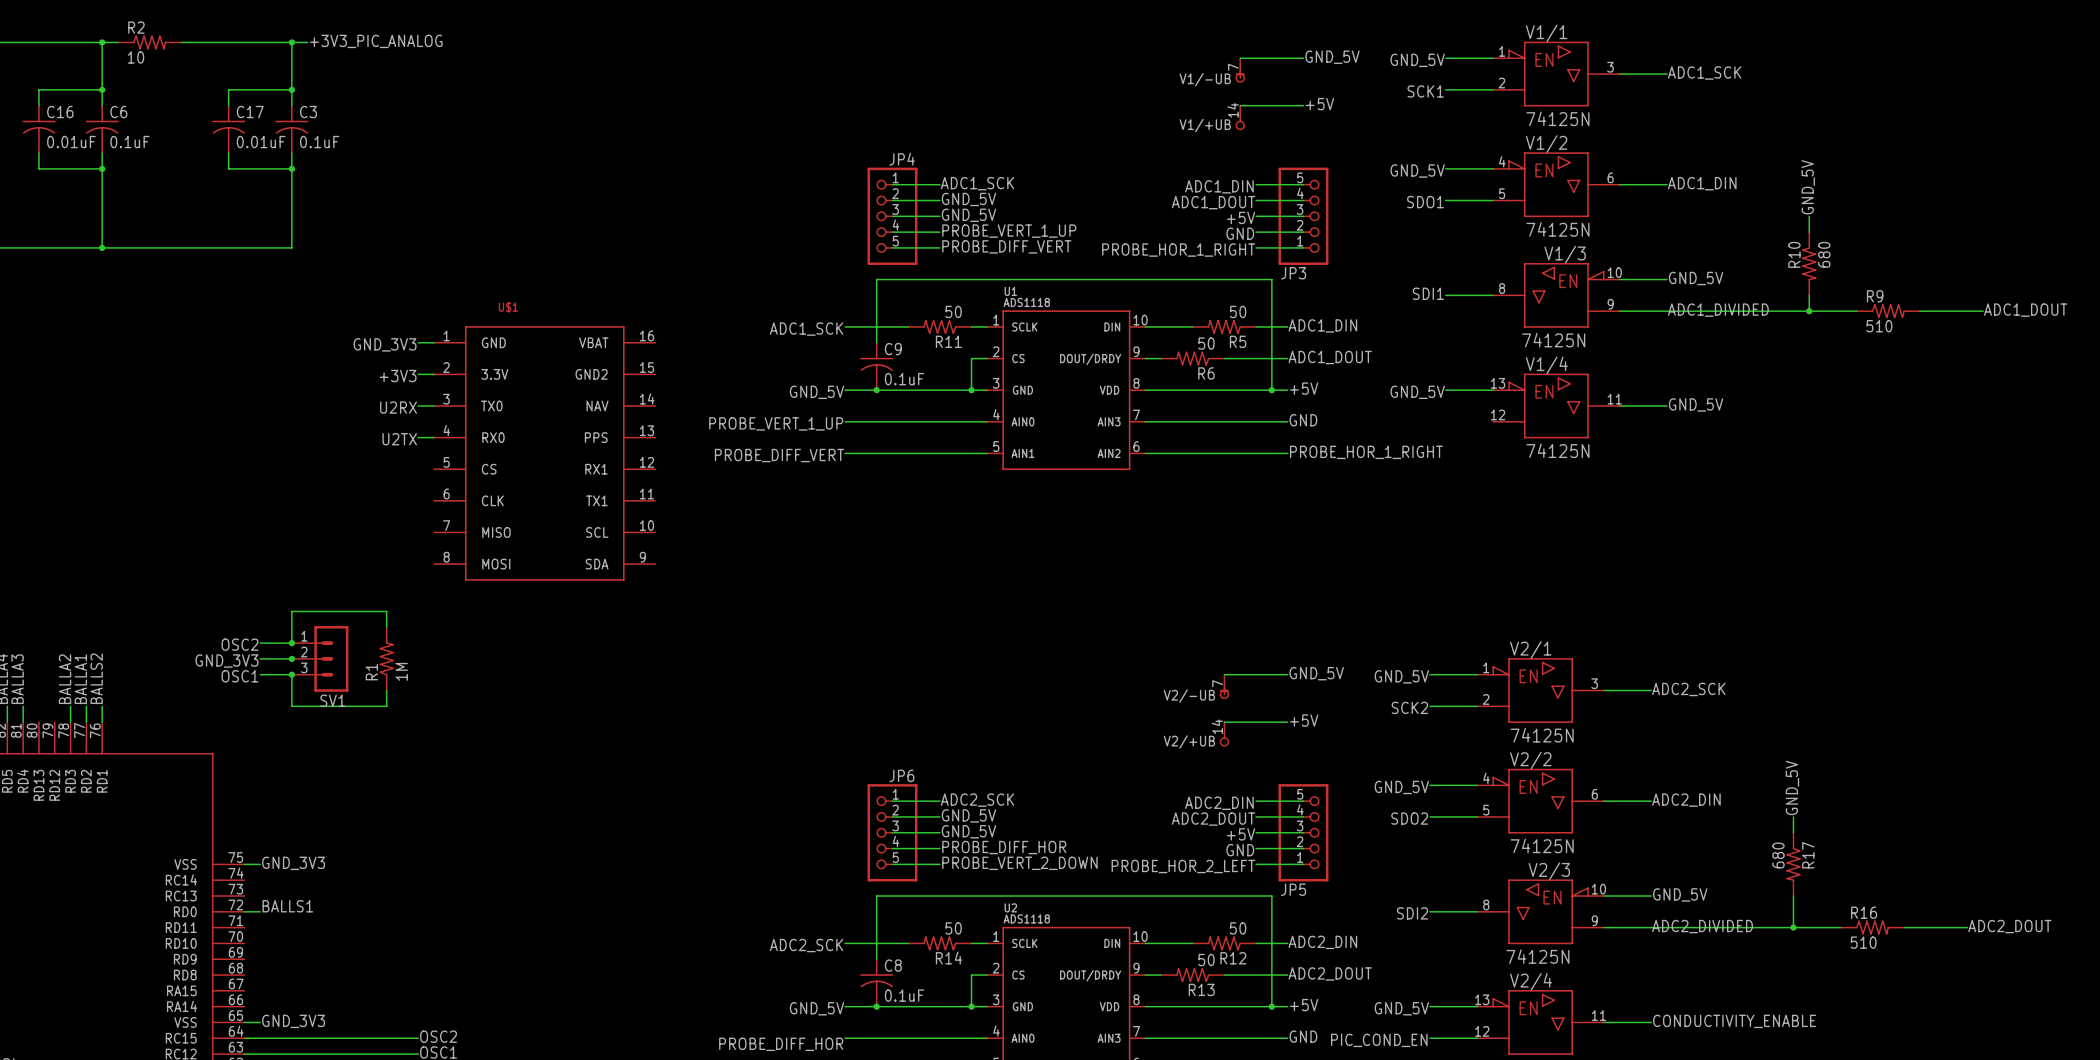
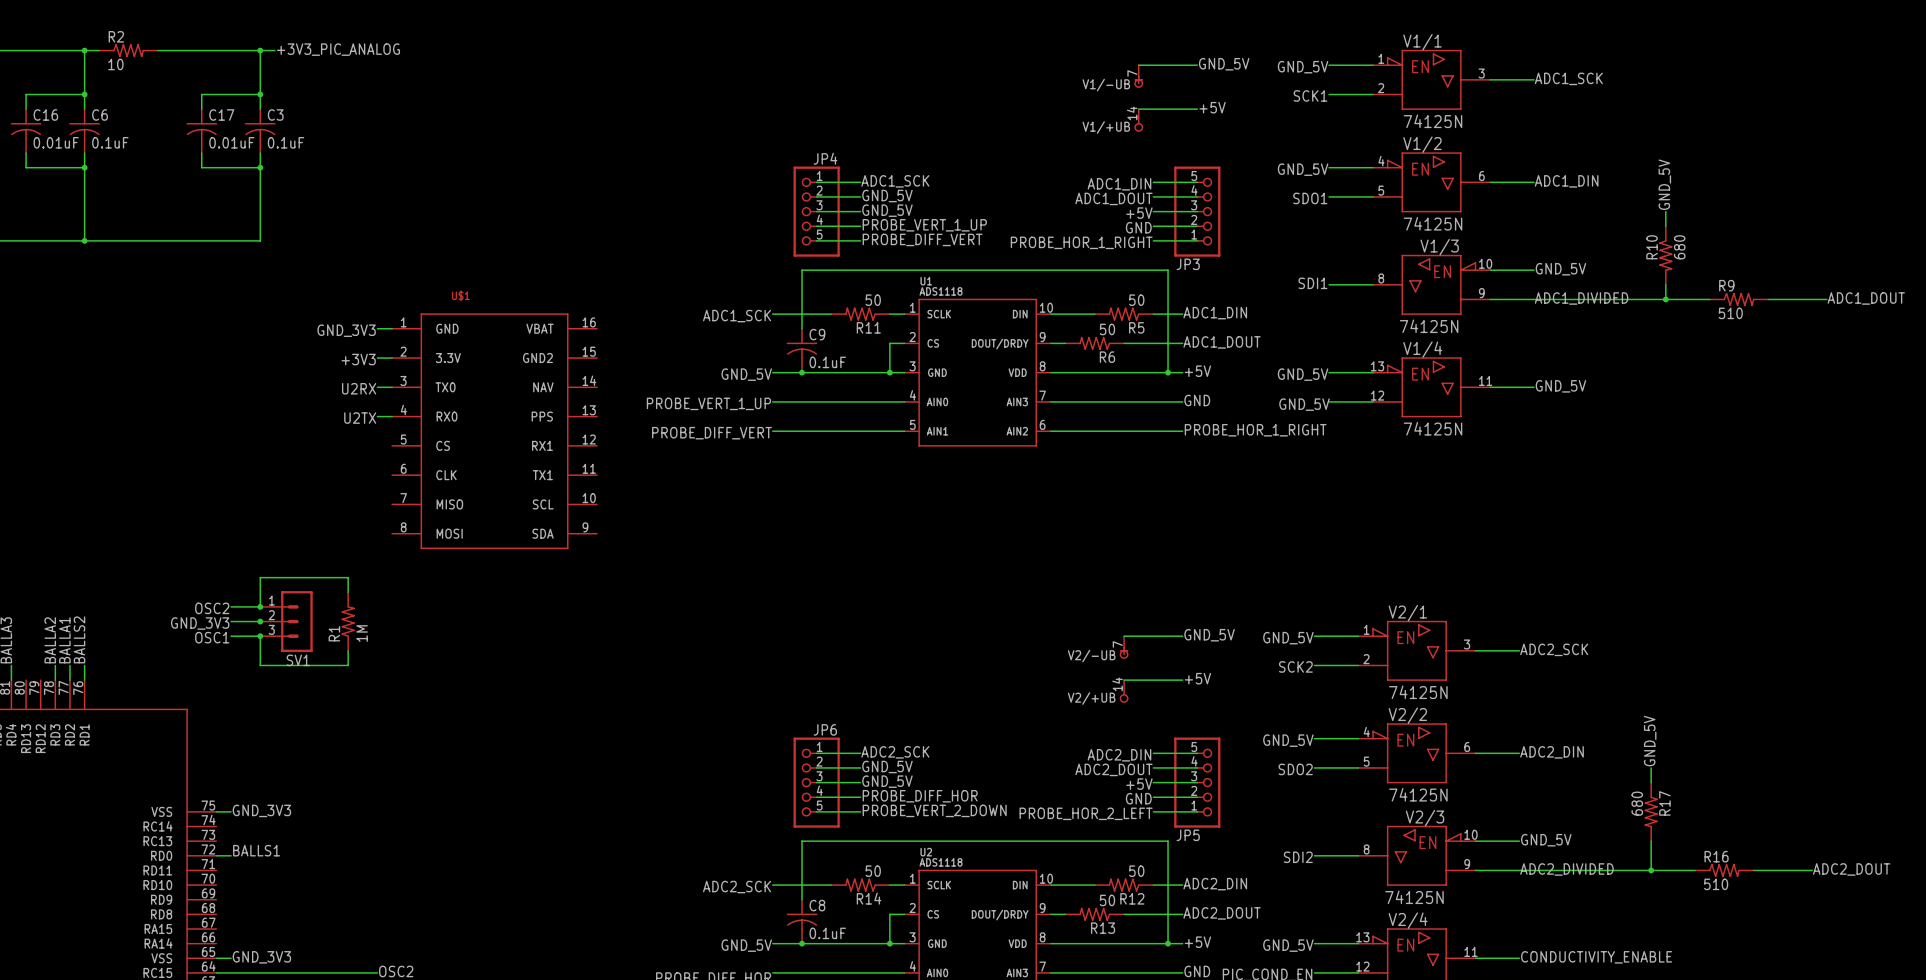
wire: none -> (1329, 401) (1372, 401)
label: none -> GND_5V (1304, 404)

